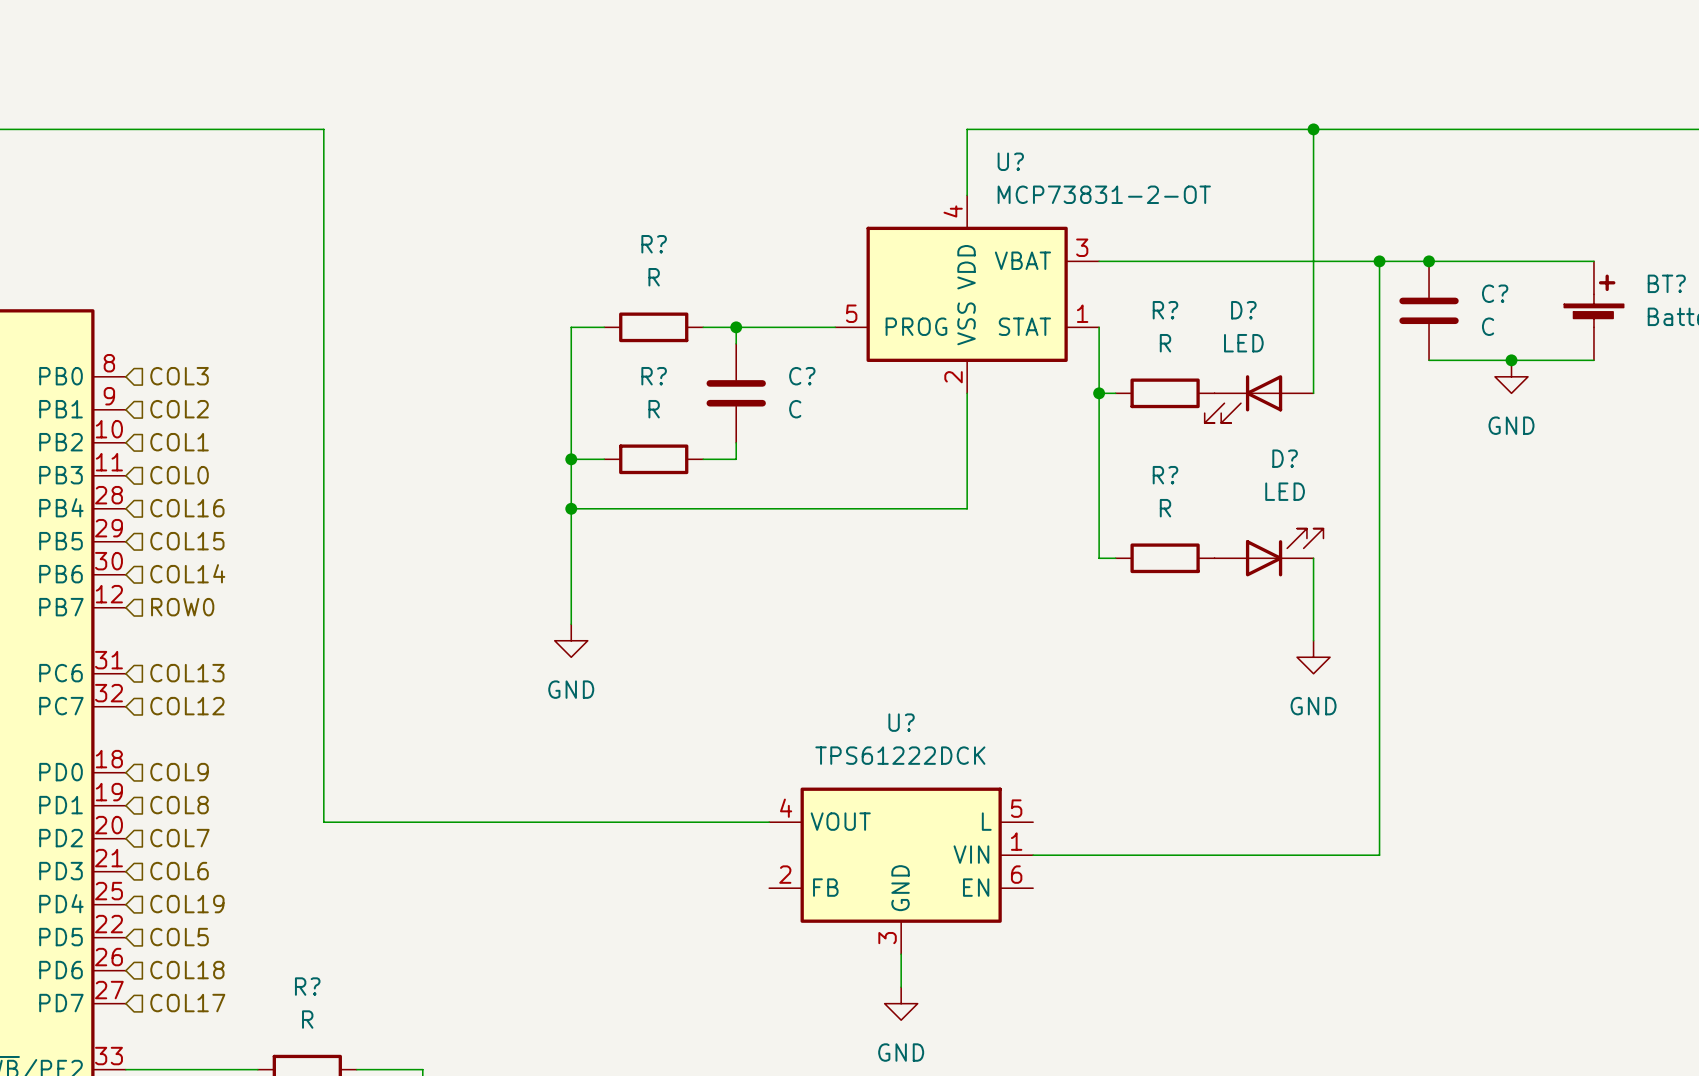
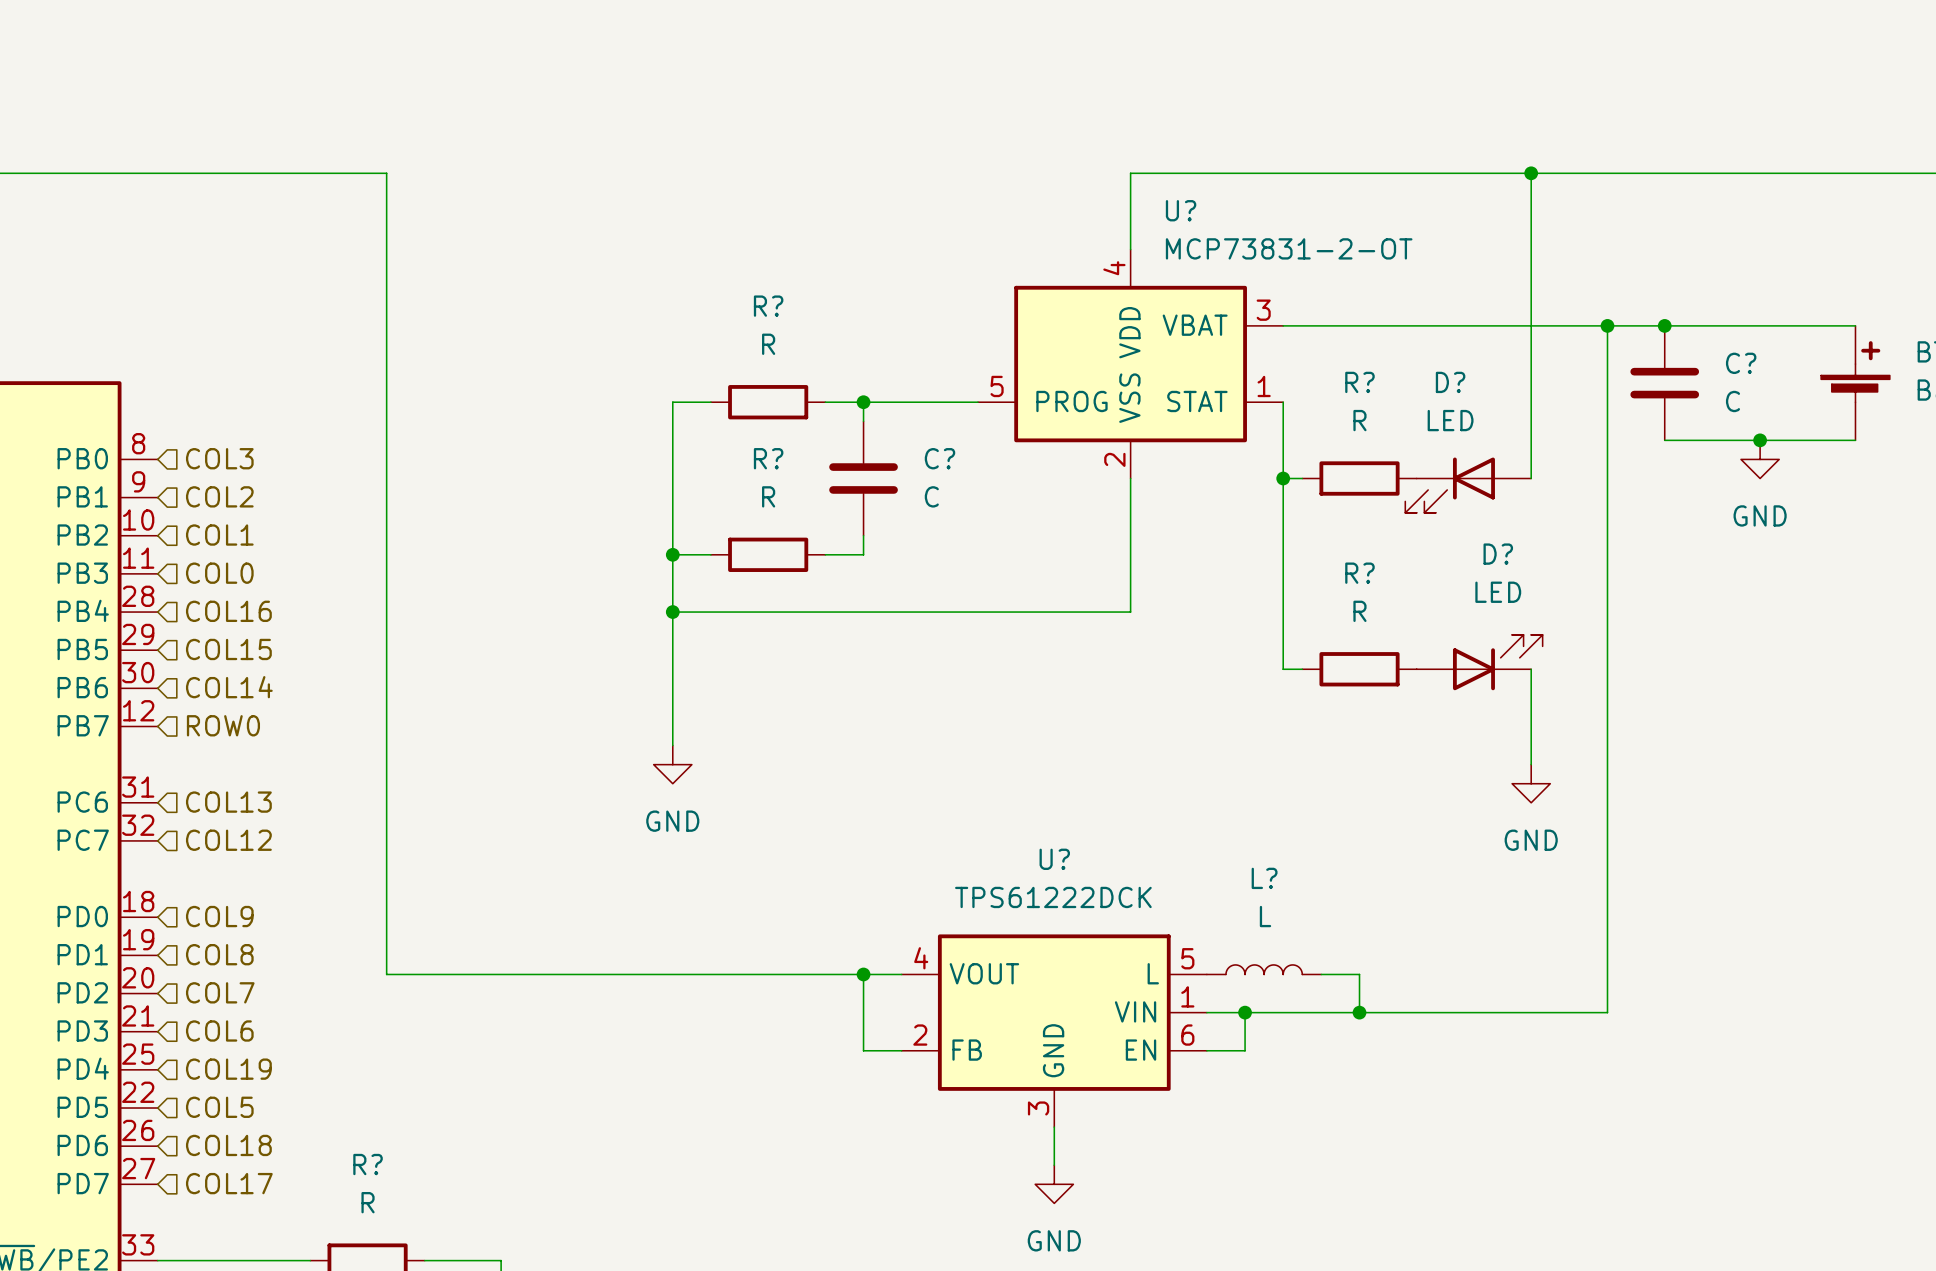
L?: none -> L (1264, 969)
wire: none -> (863, 974) (863, 1050) (901, 1050)
junction: none -> (863, 974)
wire: none -> (1321, 974) (1359, 974) (1359, 1012)
wire: none -> (1245, 1012) (1245, 1050) (1206, 1050)
junction: none -> (1245, 1012)
junction: none -> (1359, 1012)

